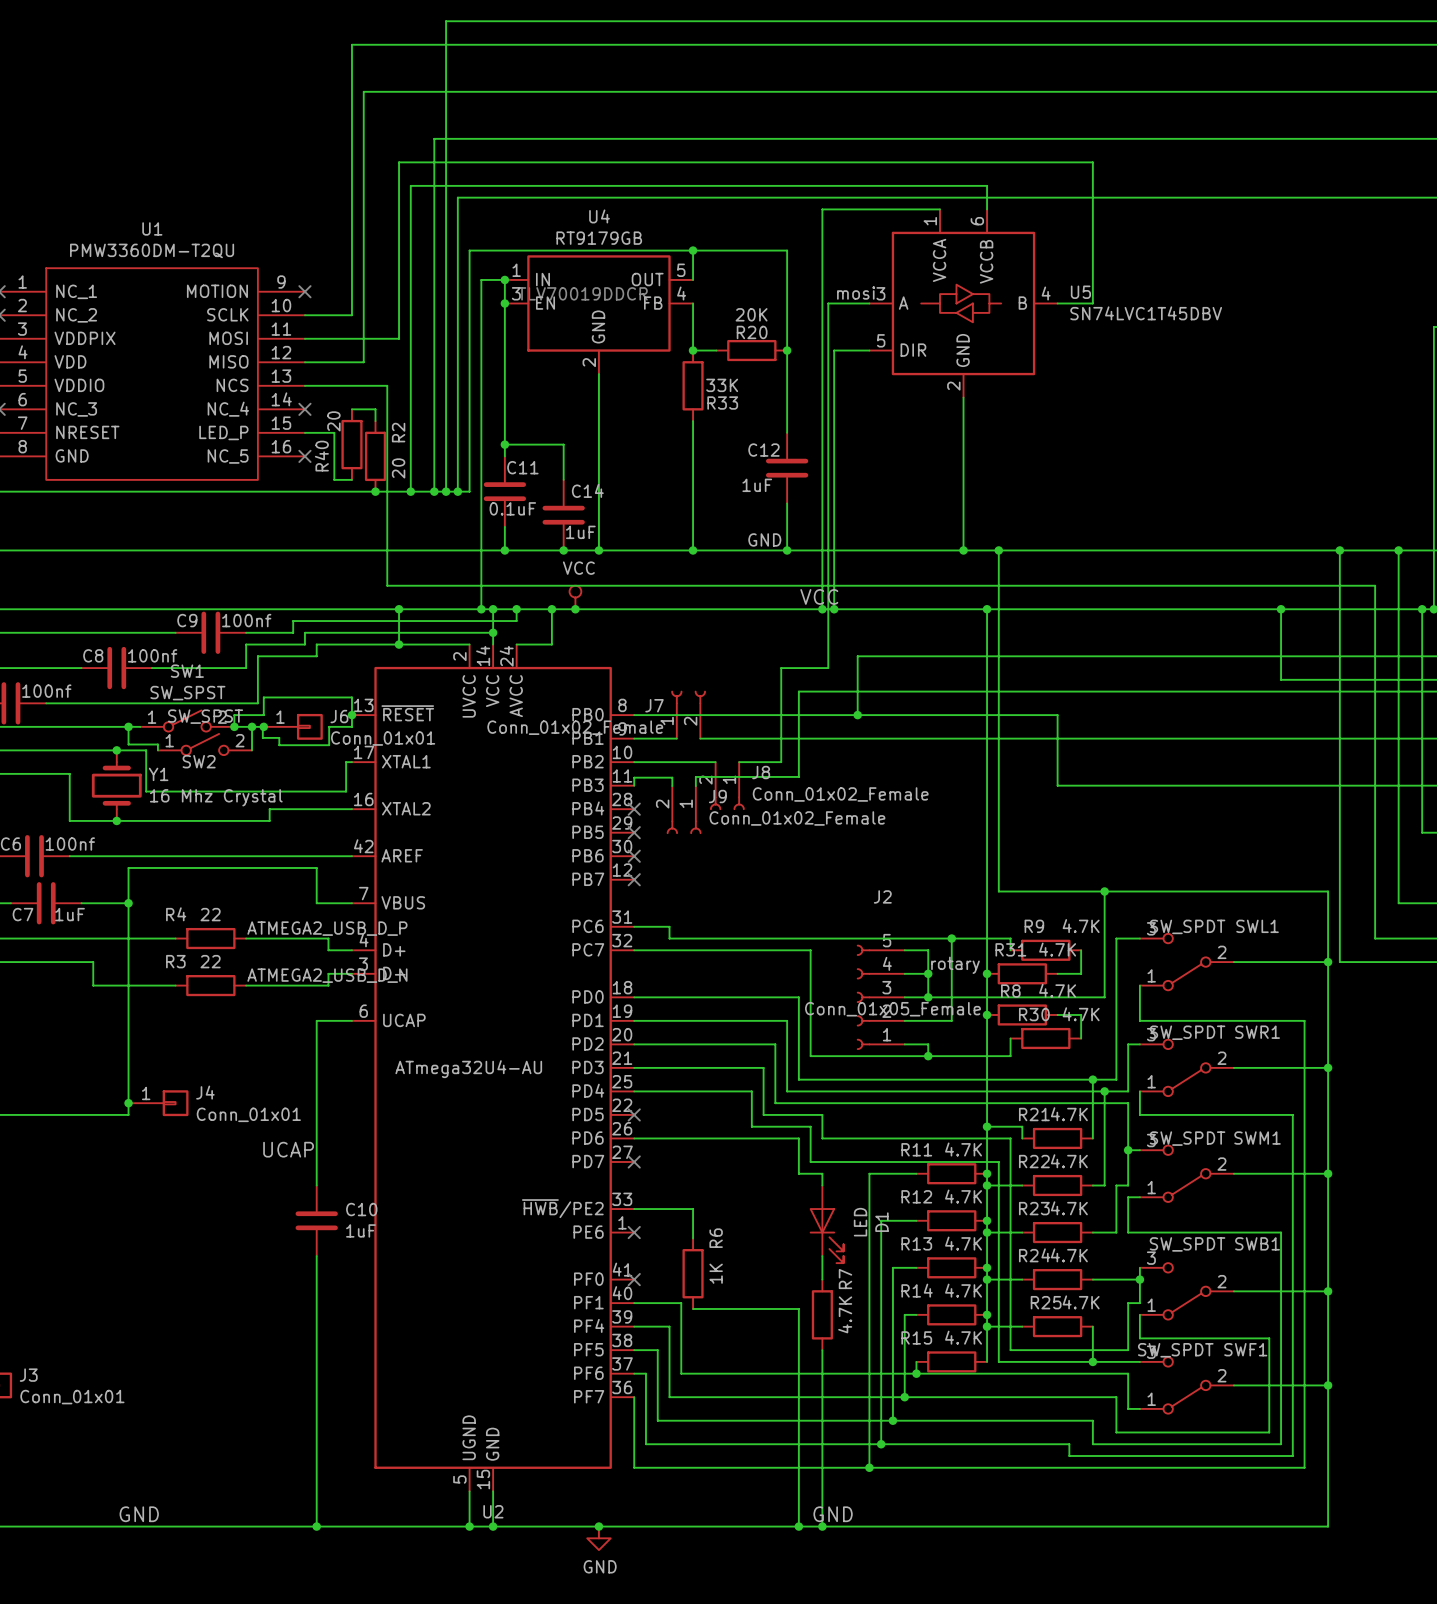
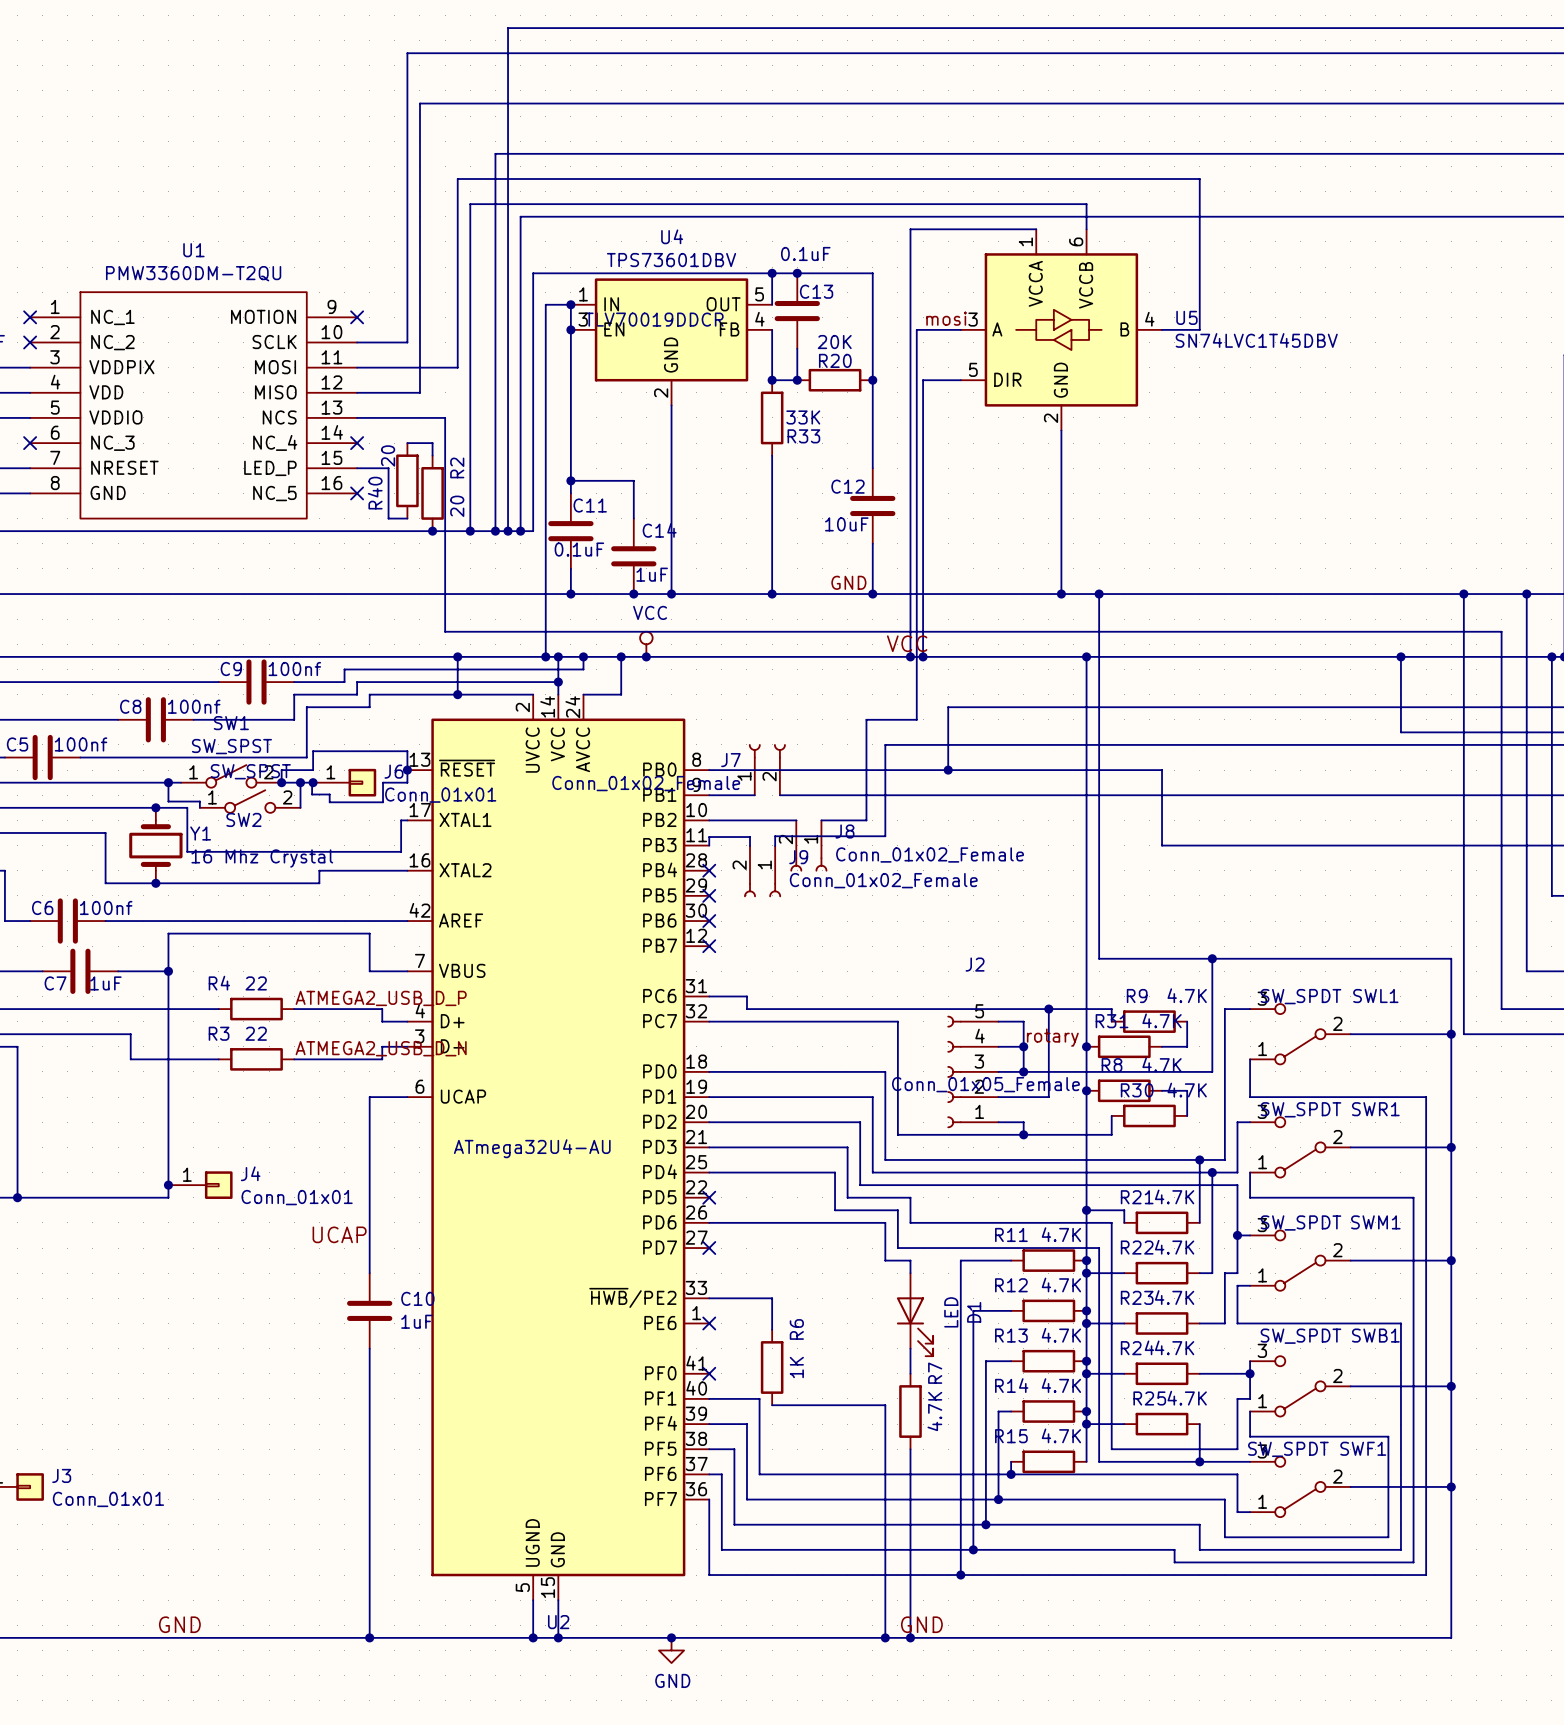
U4 value: RT9179GB (599, 238) -> TPS73601DBV (671, 260)
junction: none -> (797, 273)
C13: none -> 0.1uF (797, 311)
wire: none -> (797, 348) (797, 380)
junction: none -> (797, 380)
C12 value: 1uF (757, 485) -> 10uF (846, 524)

